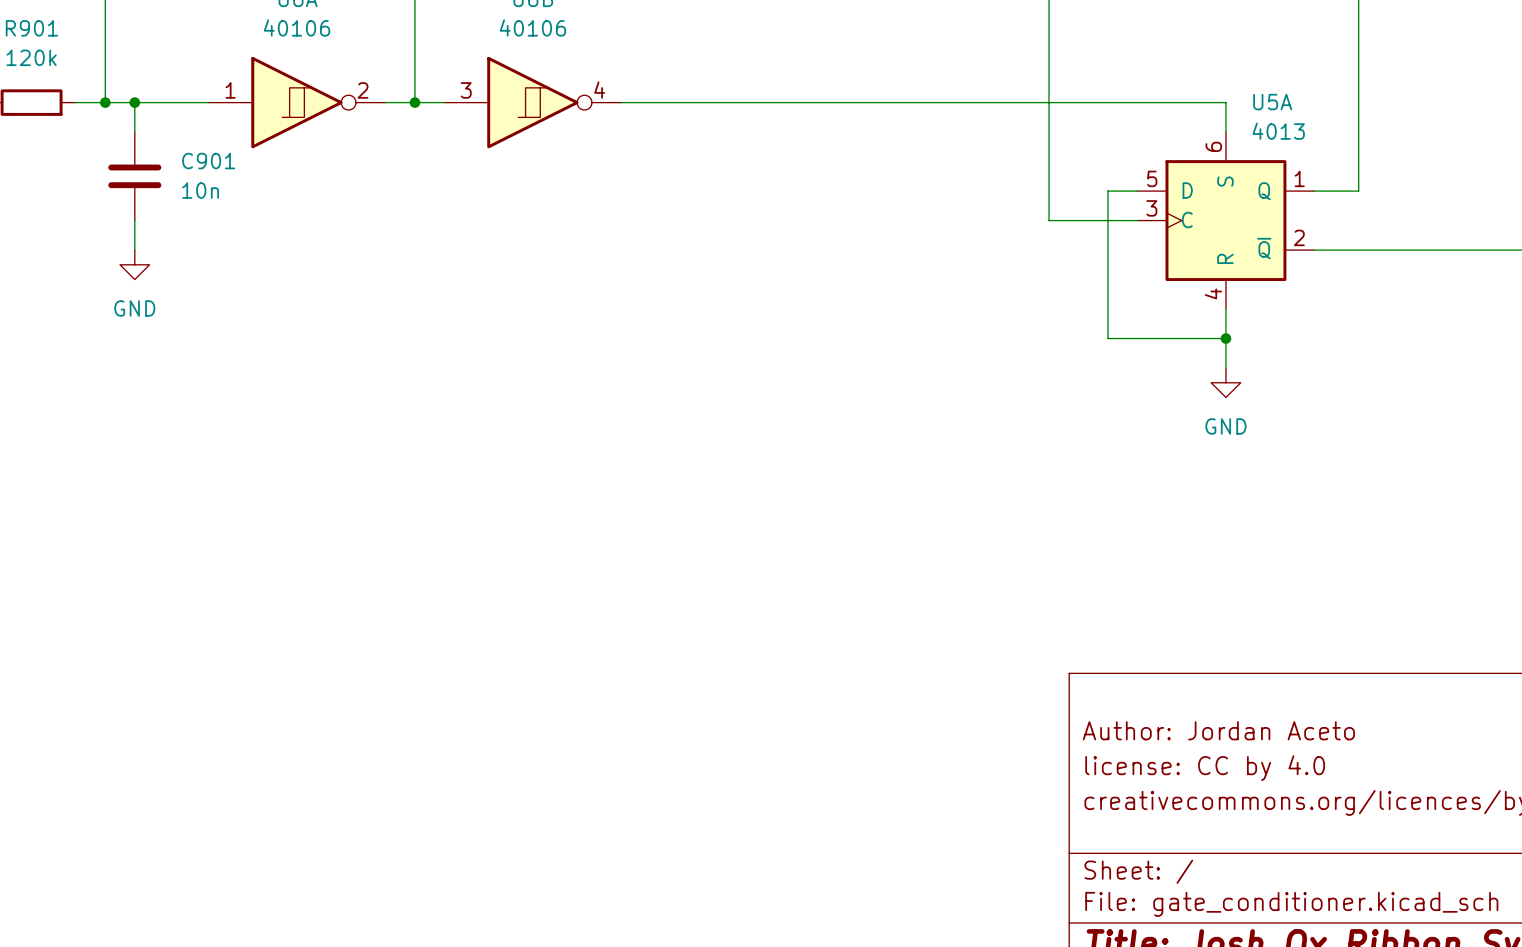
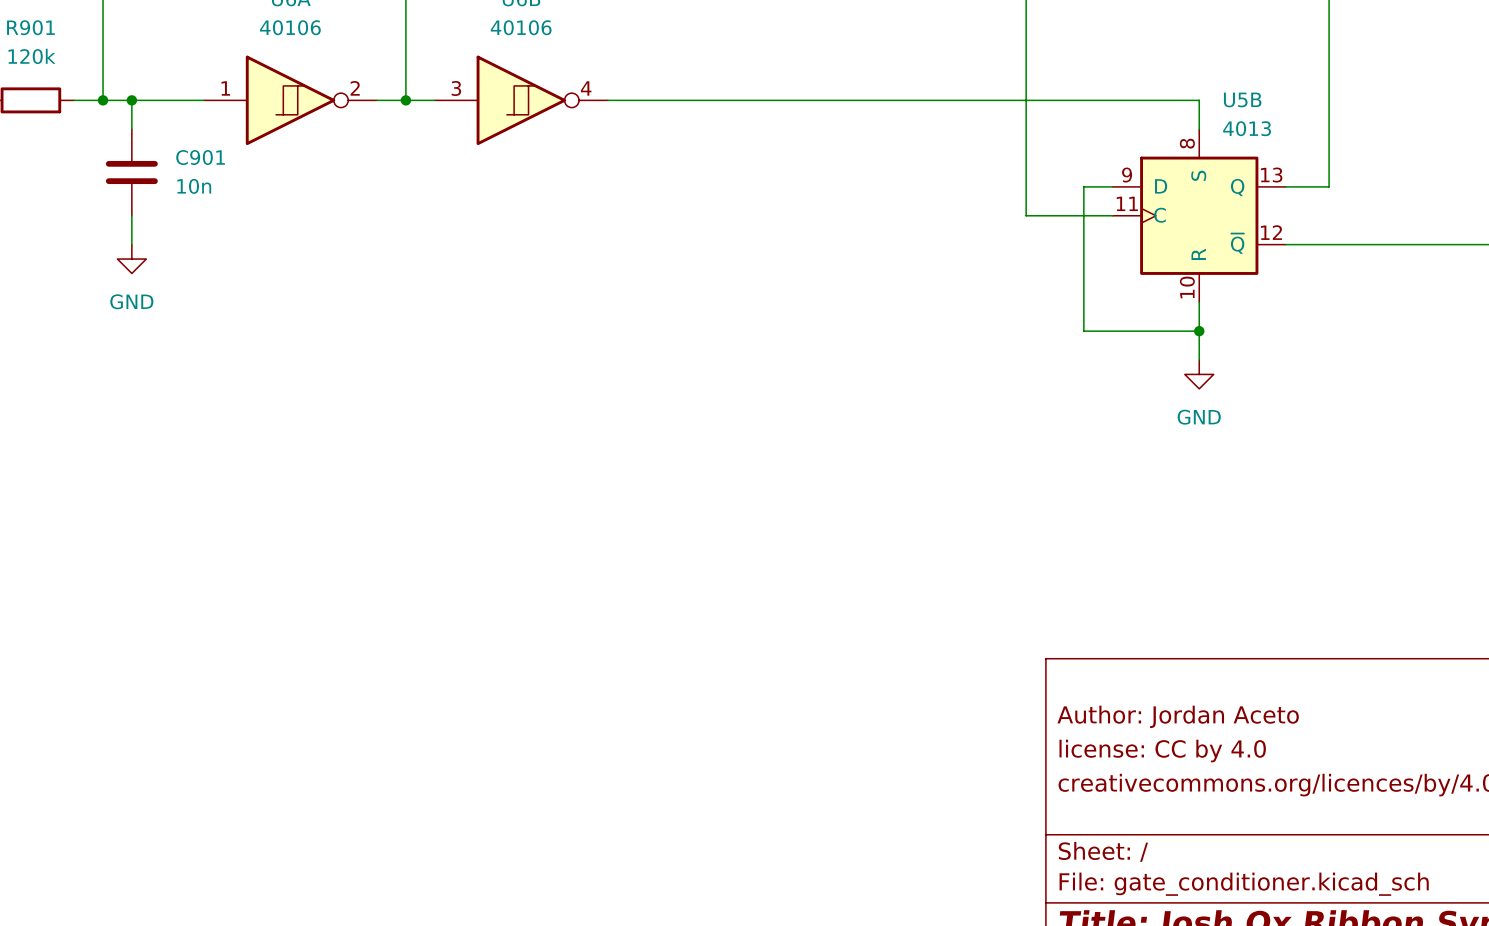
U5A name: U5A (1272, 102) -> U5B (1242, 99)
U5A pin number: 6 (1213, 146) -> 8 (1187, 143)
U5A pin number: 5 (1152, 178) -> 9 (1127, 175)
U5A pin number: 1 (1299, 178) -> 13 (1271, 175)
U5A pin number: 3 (1151, 208) -> 11 (1127, 203)
U5A pin number: 2 (1299, 237) -> 12 (1271, 232)
U5A pin number: 4 (1213, 293) -> 10 (1187, 287)

